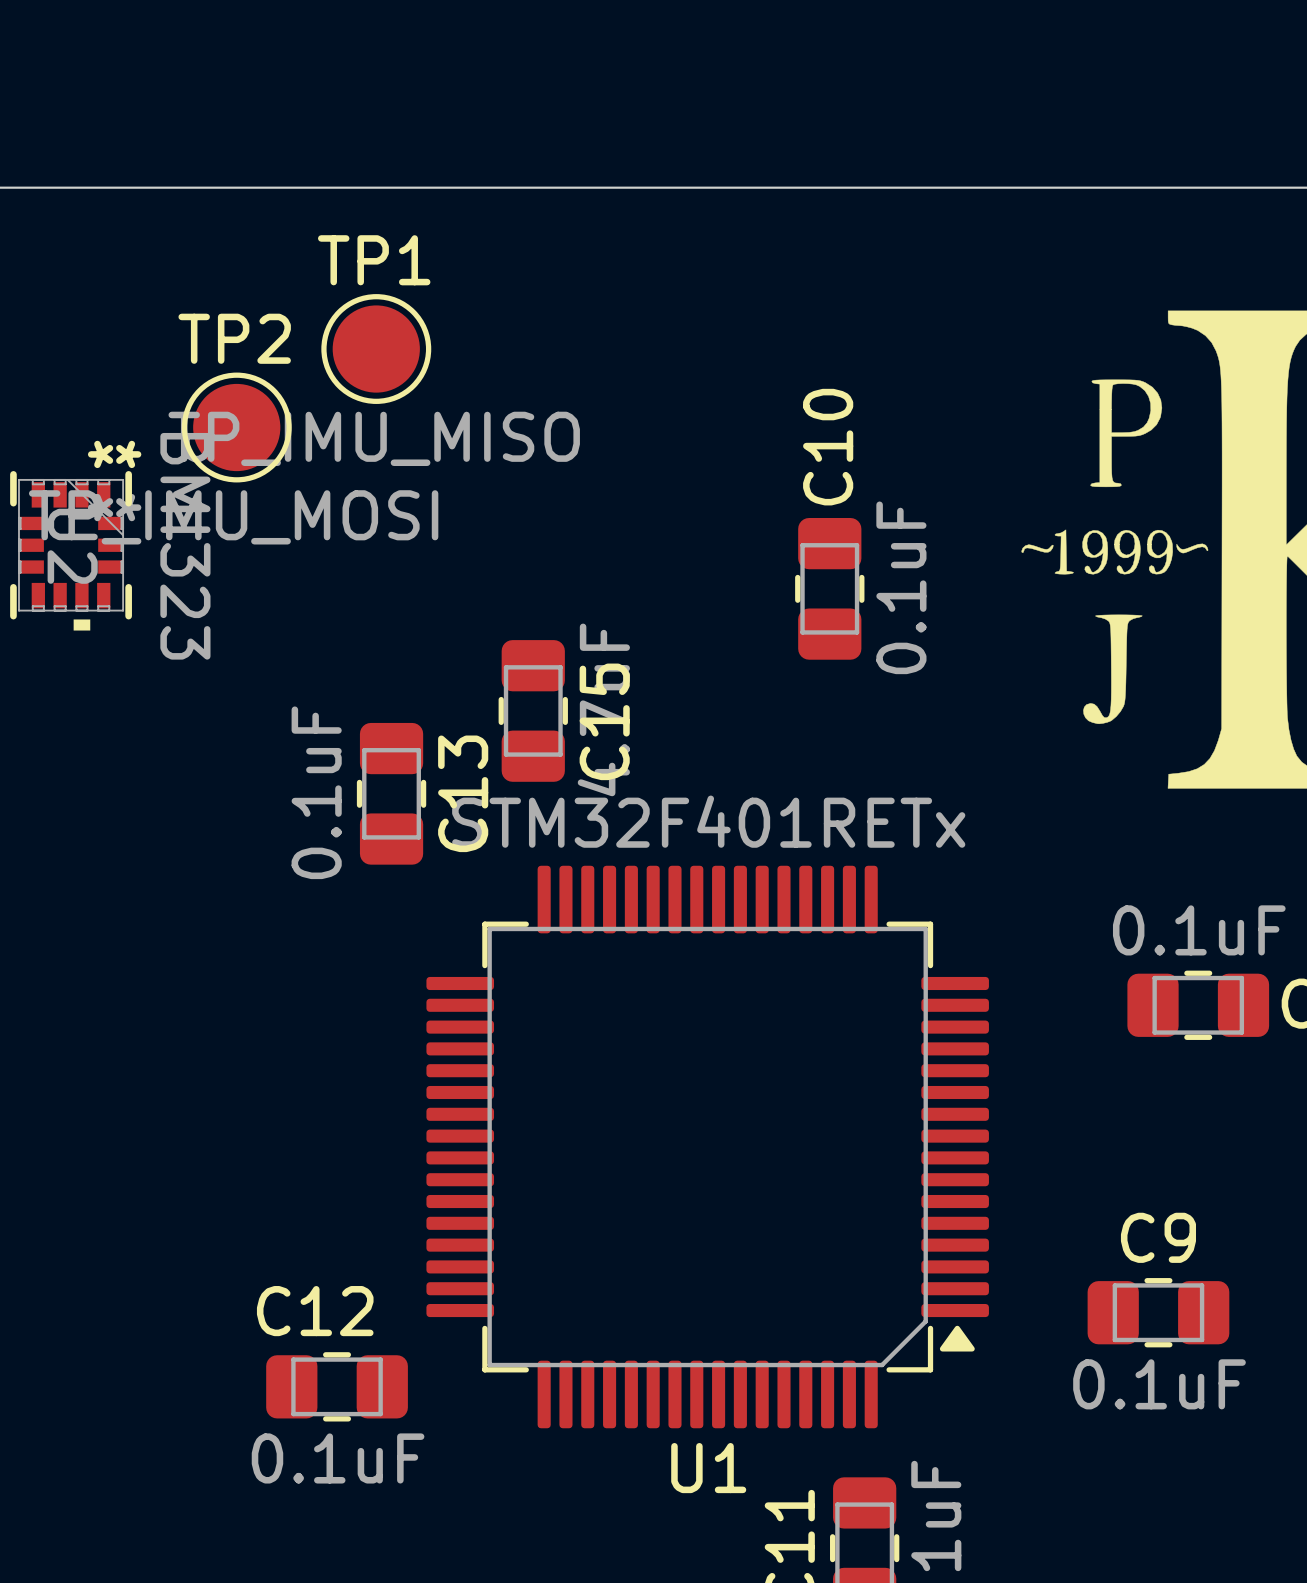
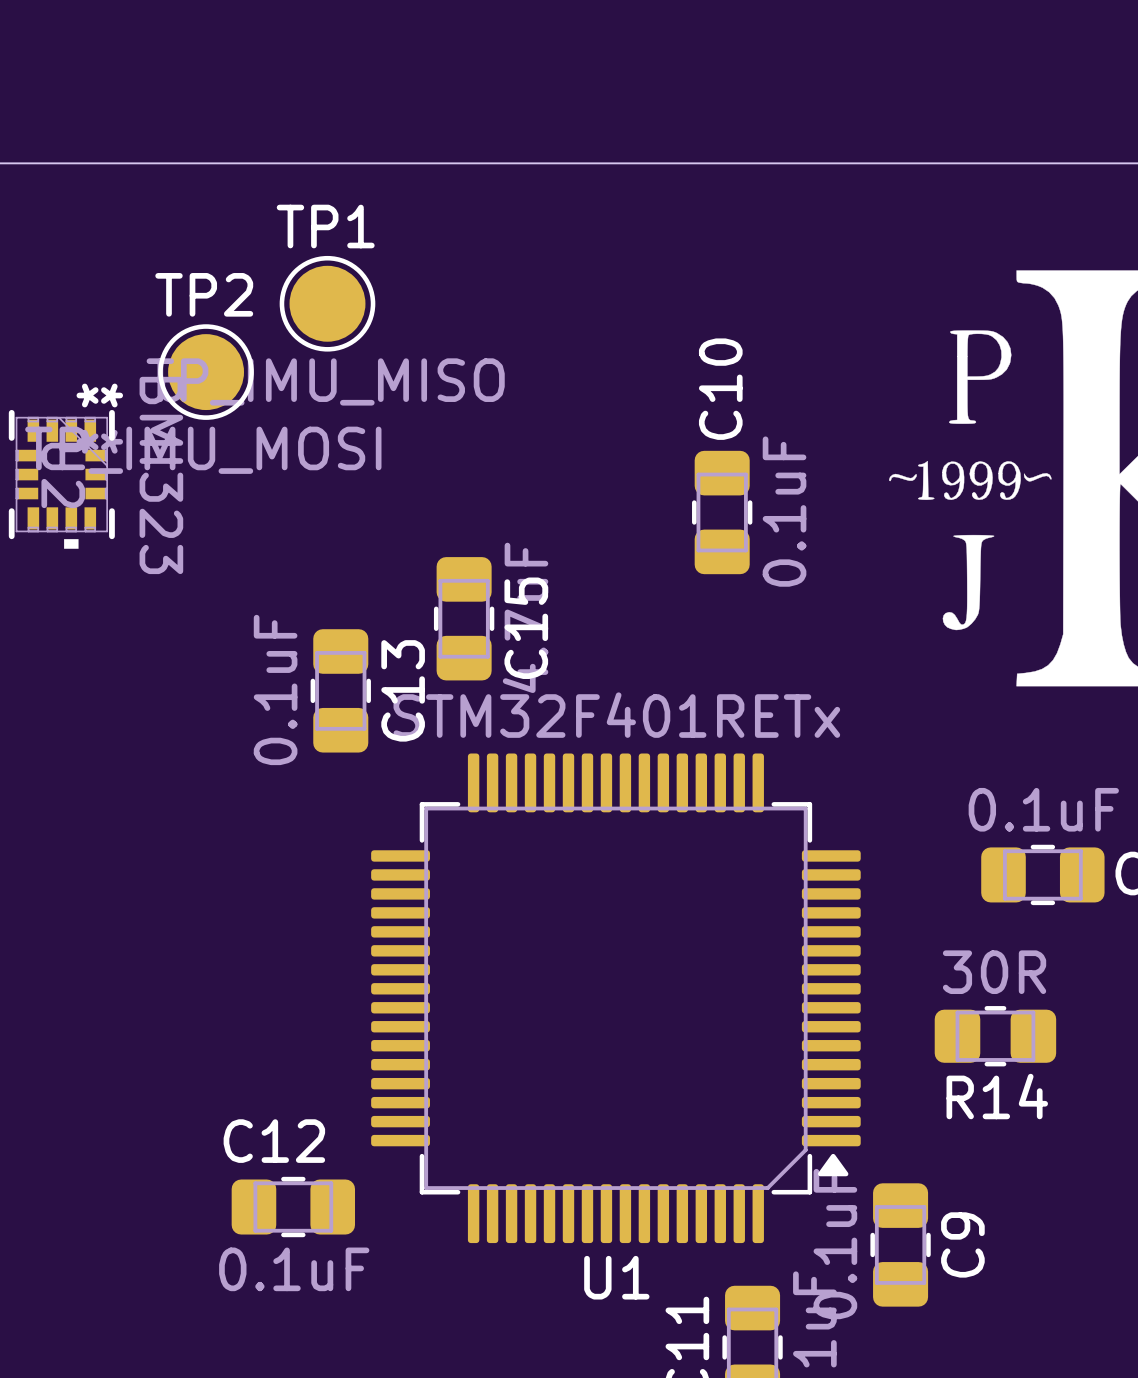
R14: none -> 30R (995, 1036)
C9 rotation: 0° (1158, 1312) -> 90° clockwise (900, 1244)
C9 position: (1158, 1312) -> (900, 1244)

